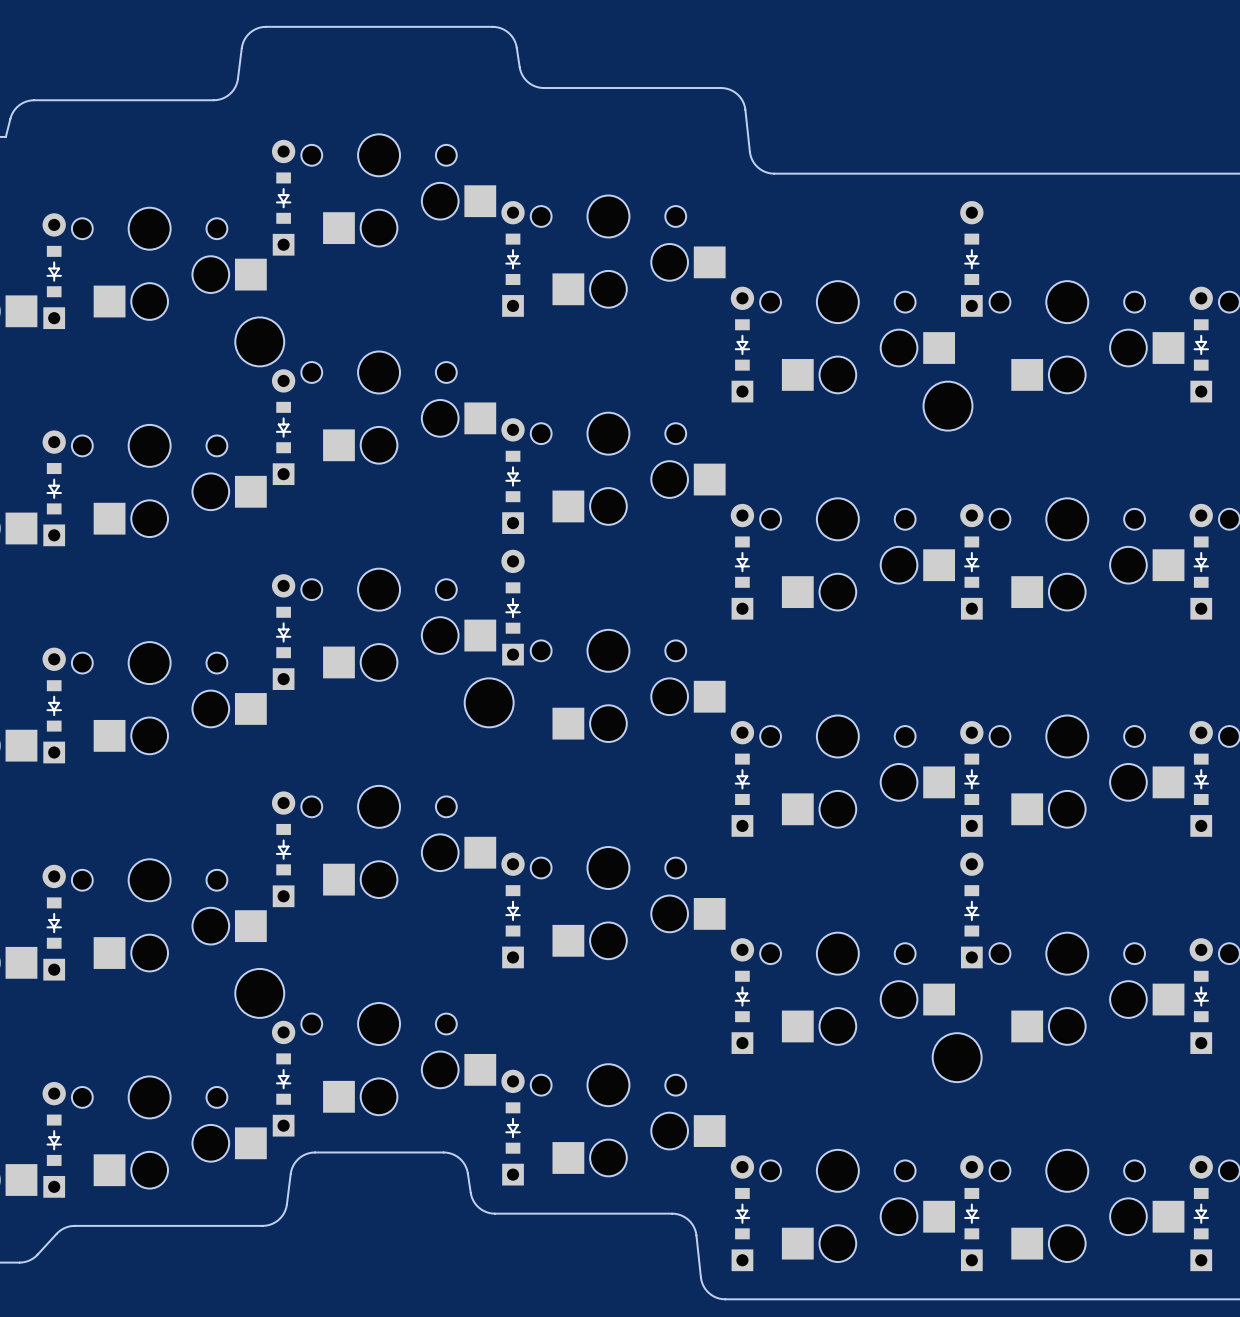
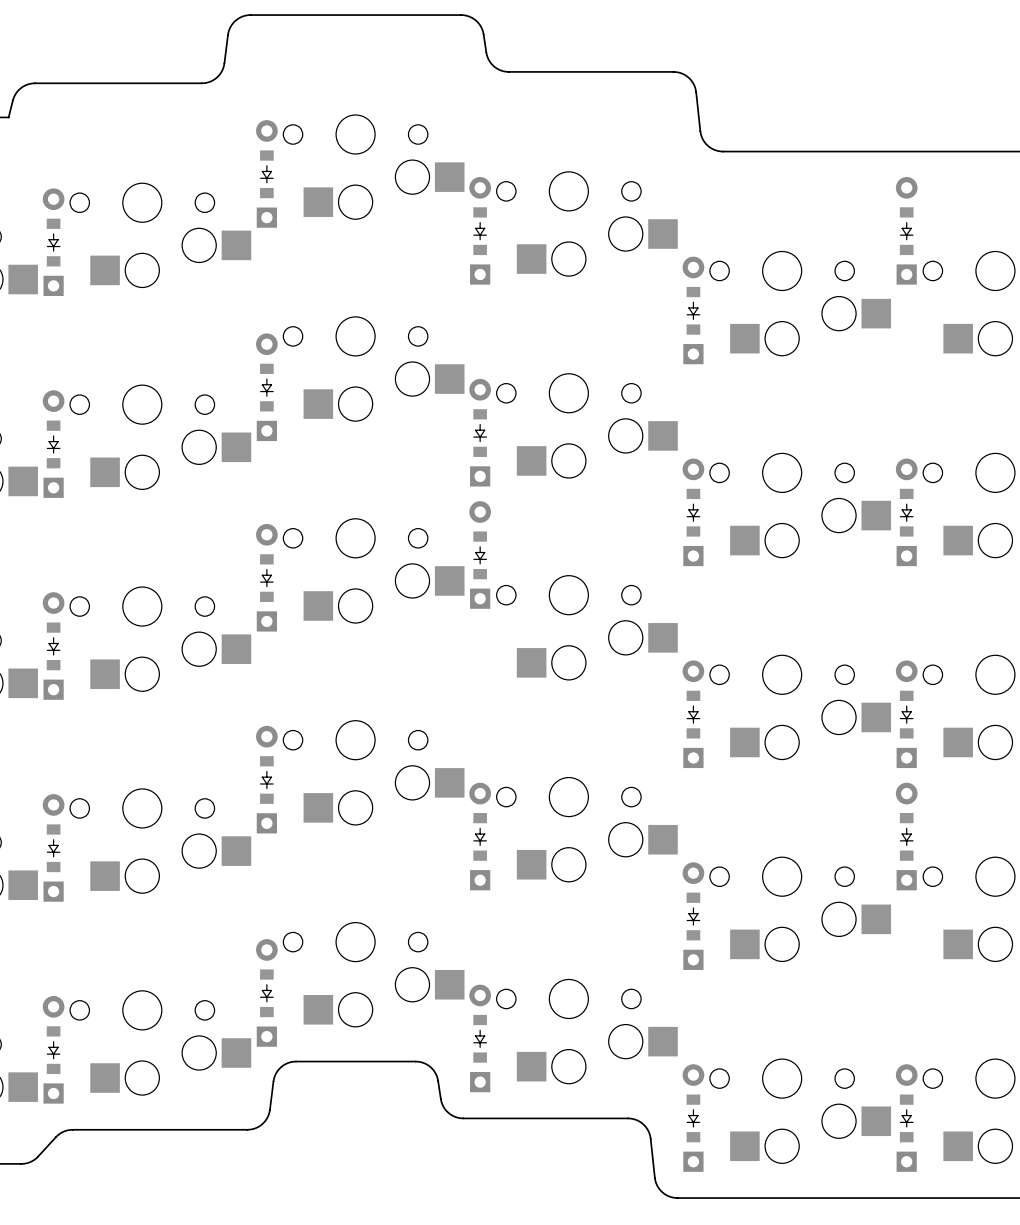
part: (259, 341) -> none
part: (947, 406) -> none
part: (489, 702) -> none
part: (259, 993) -> none
part: (957, 1057) -> none

